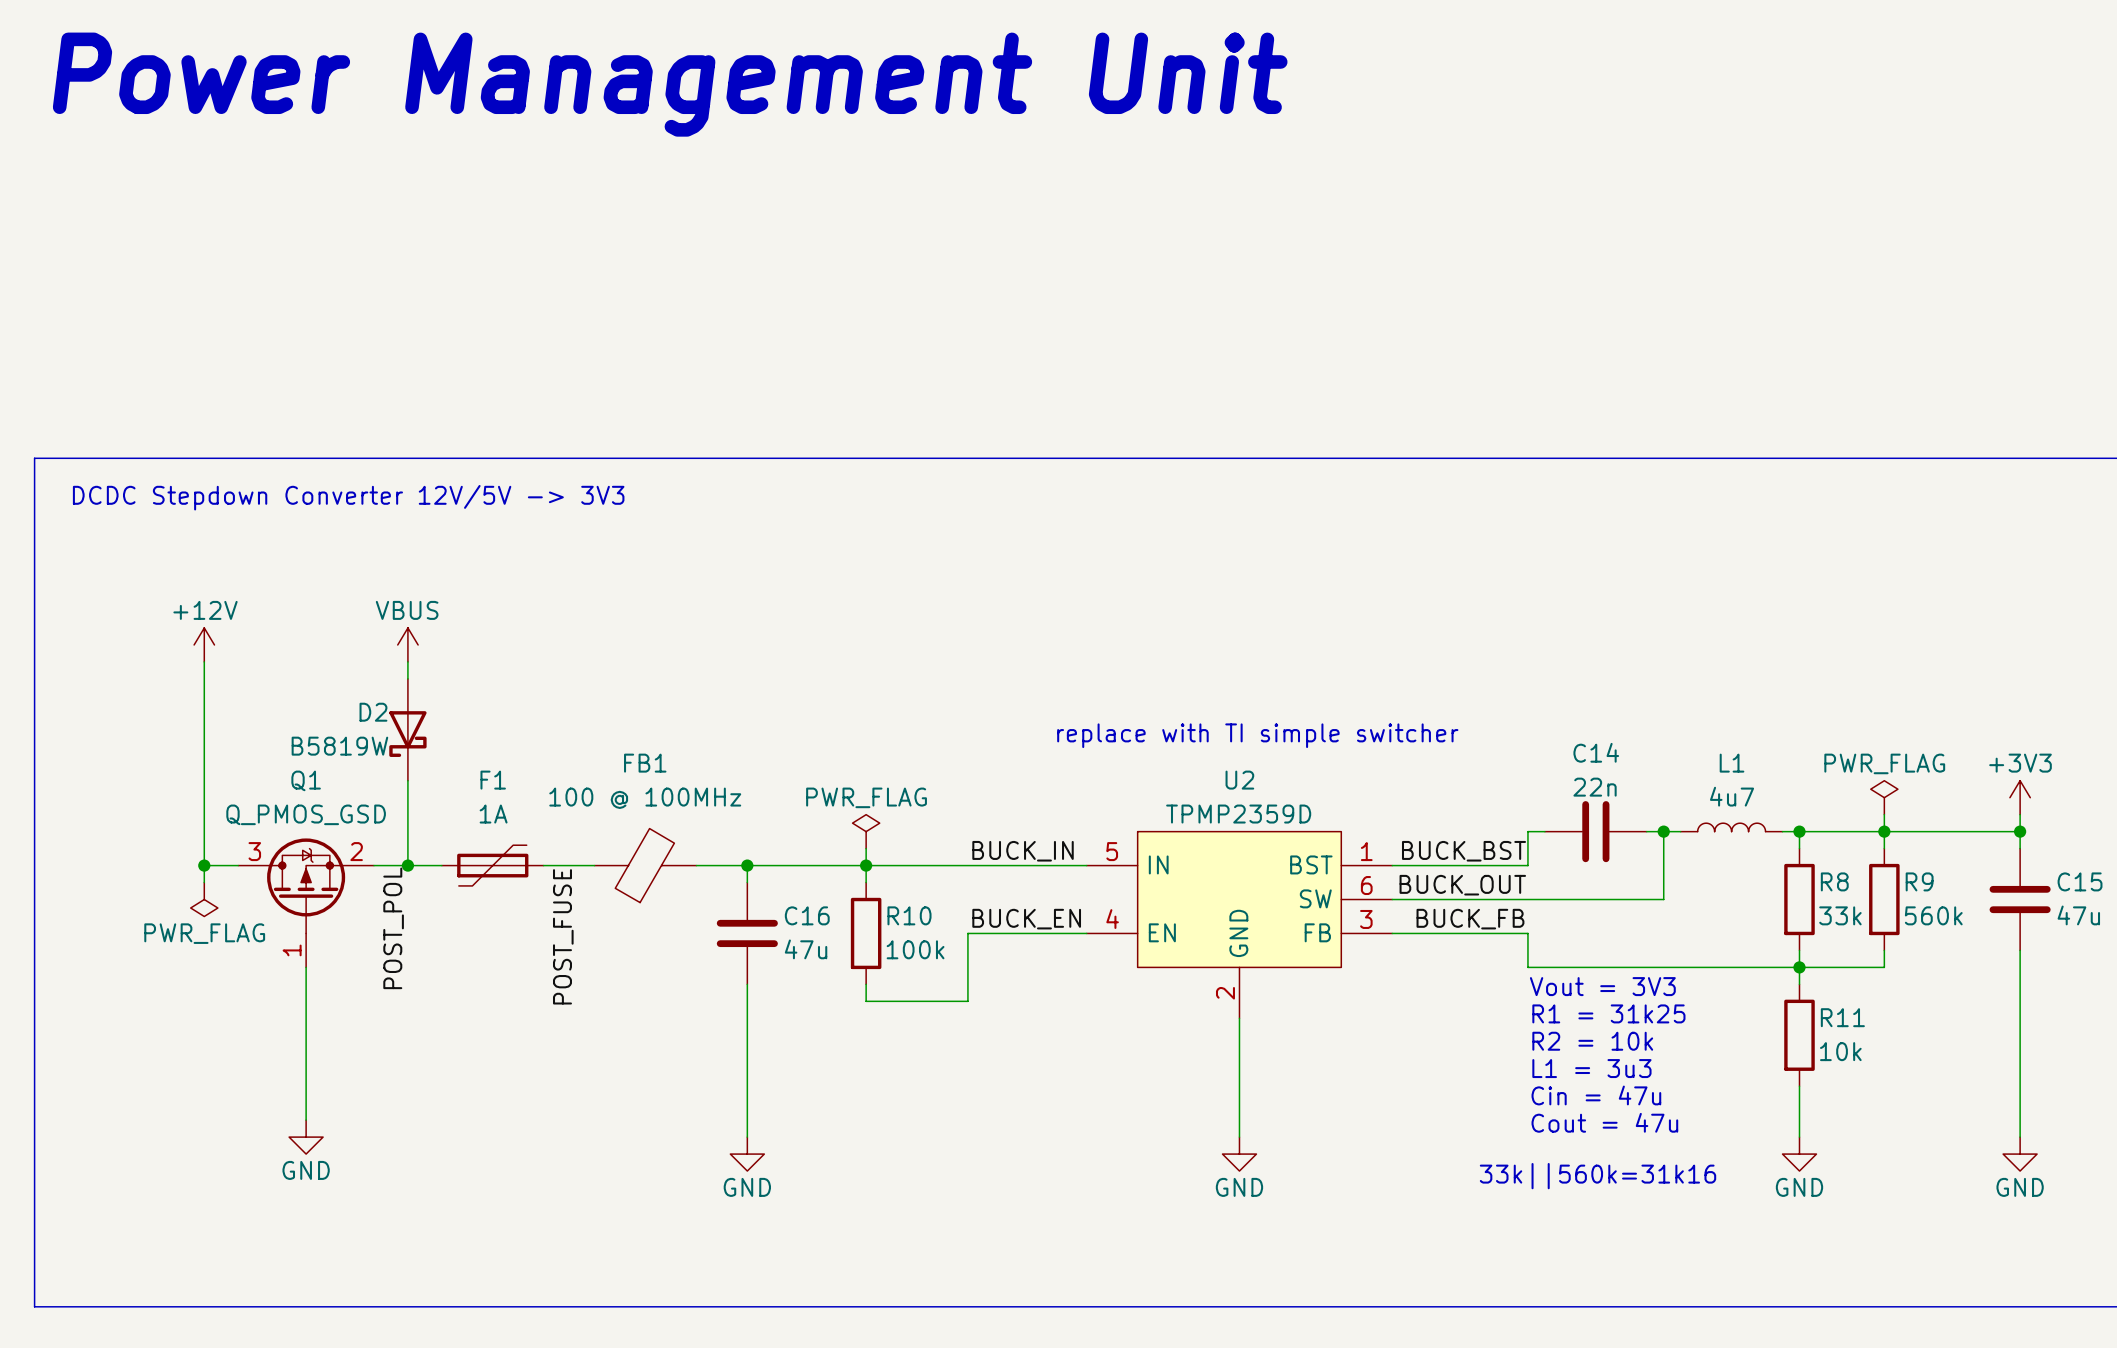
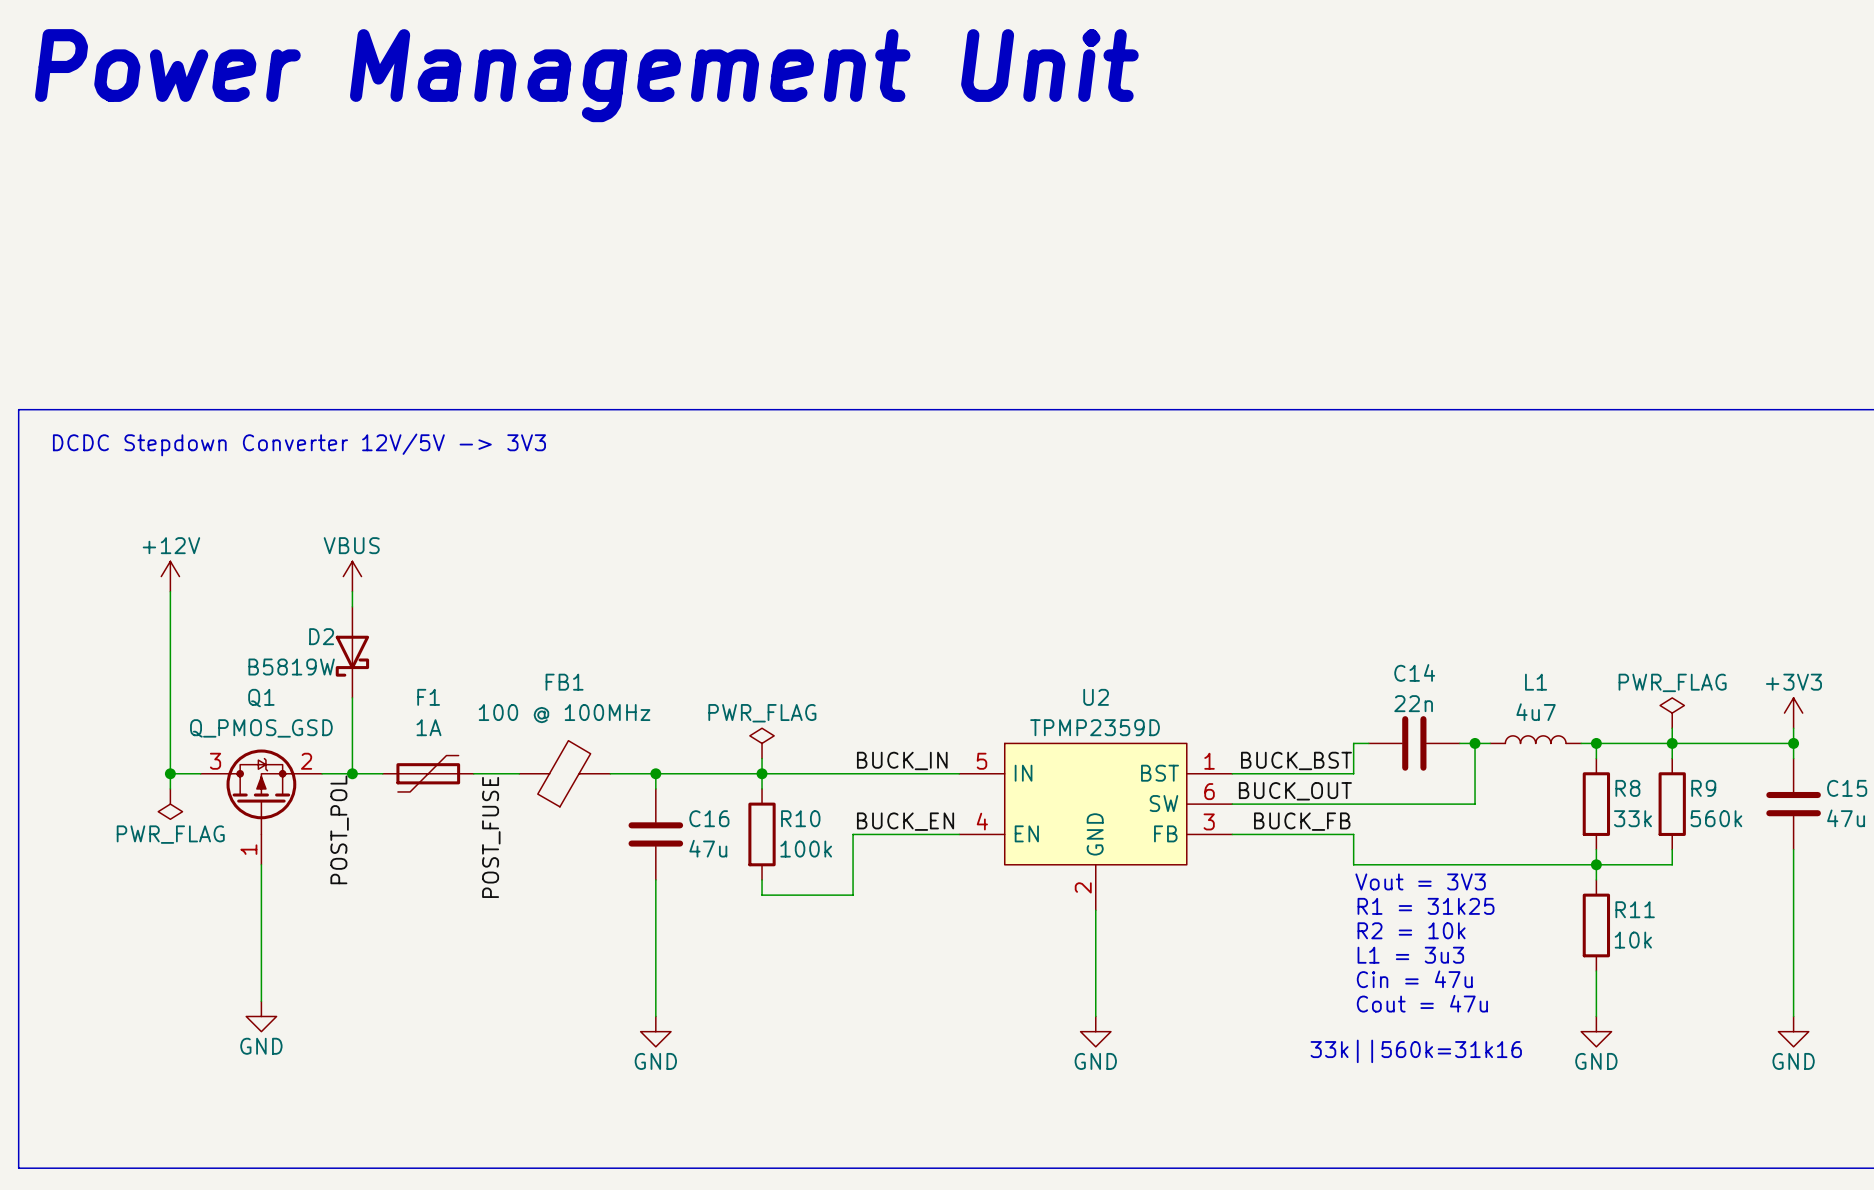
text: replace with TI simple switcher (1257, 735) -> none

